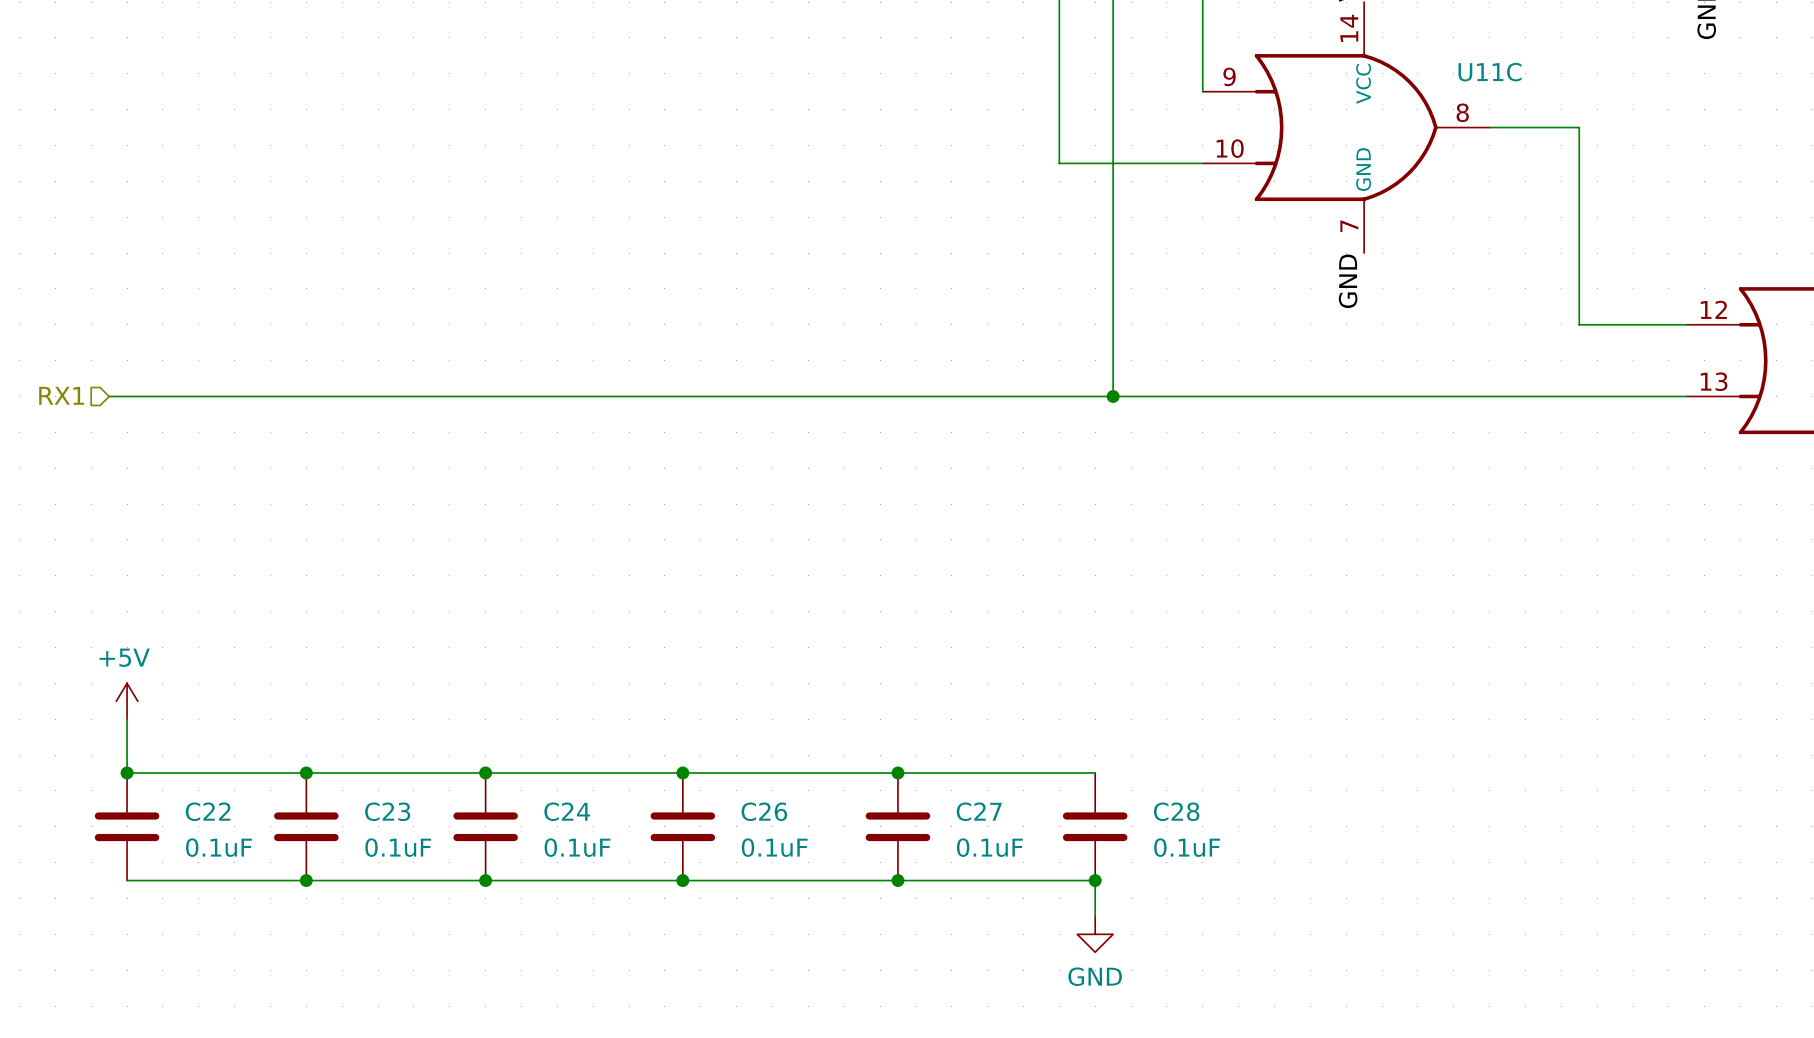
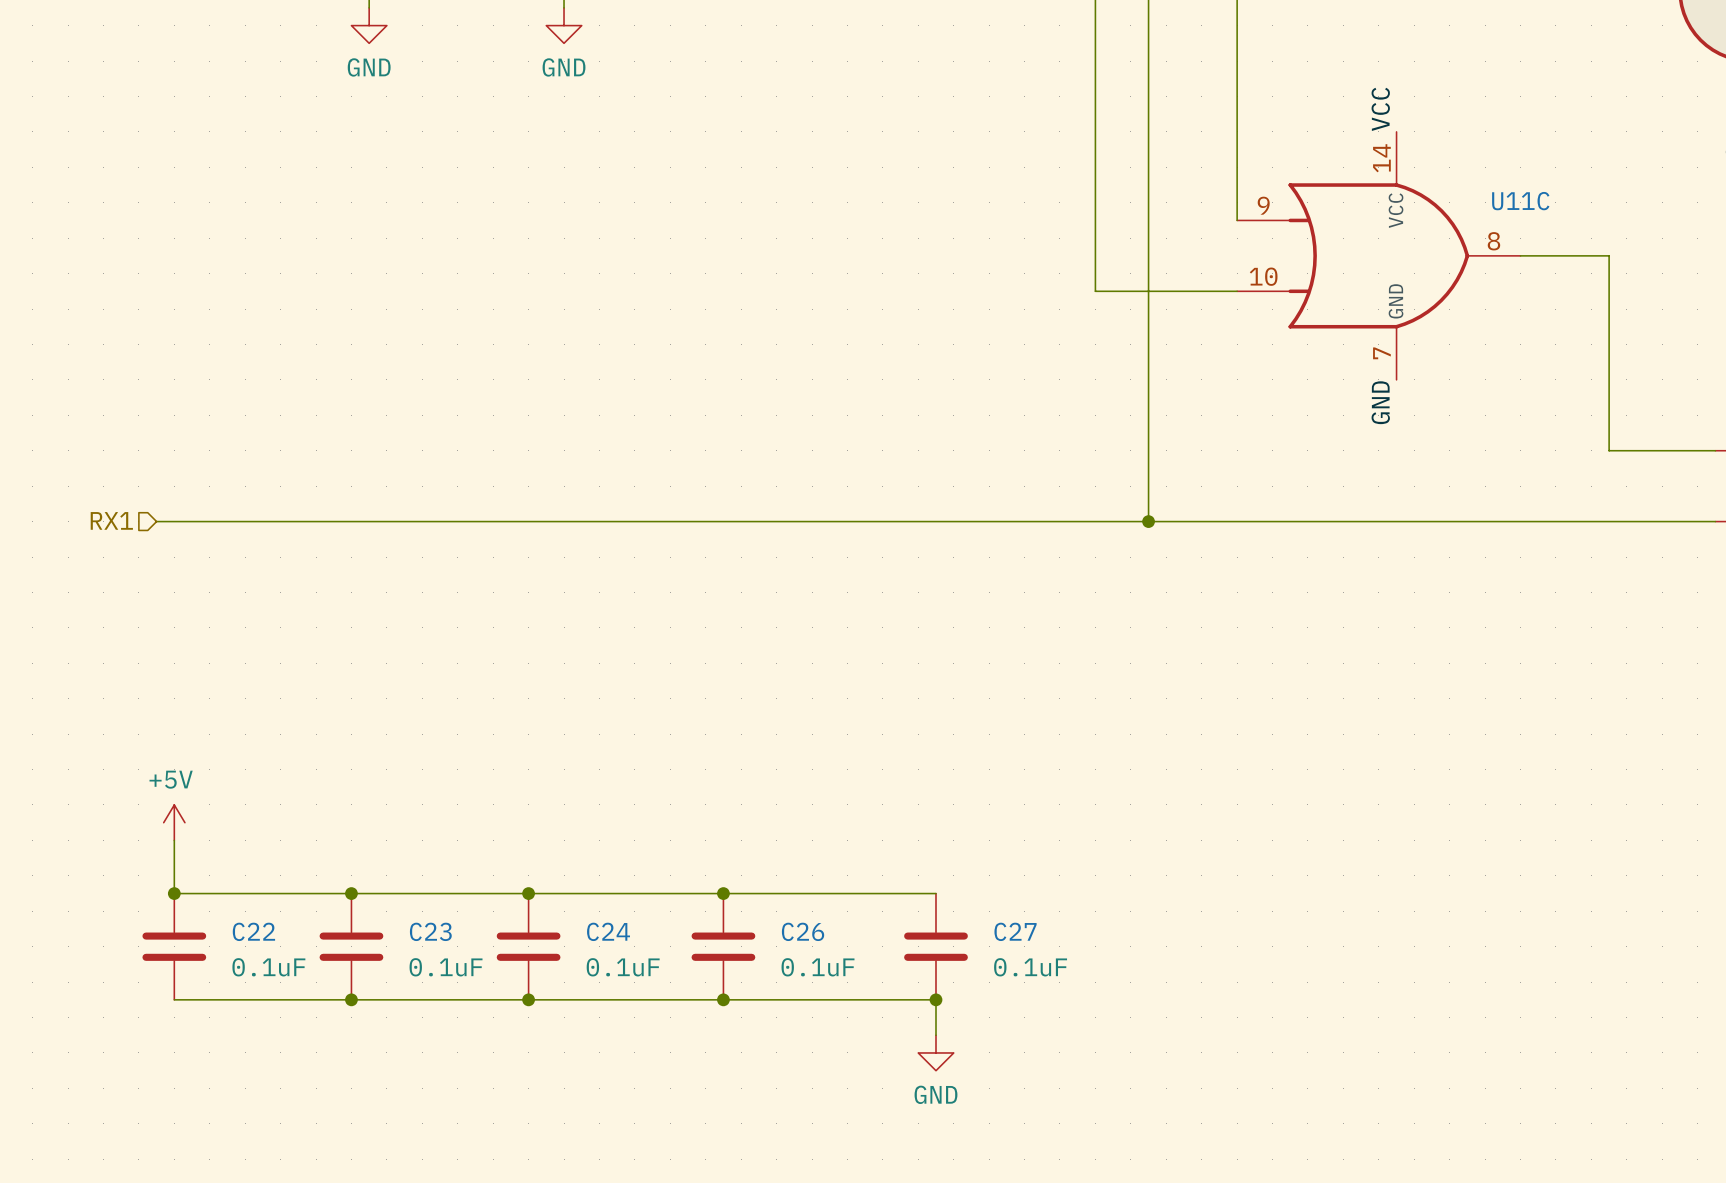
wire: (897, 772) (1095, 772) -> none
junction: (897, 772) -> none
C28: 0.1uF (1095, 826) -> none
wire: (897, 880) (1095, 880) (1095, 916) -> (935, 999) (935, 1035)
junction: (1095, 880) -> none
power symbol position: GND (1095, 934) -> GND (935, 1052)

